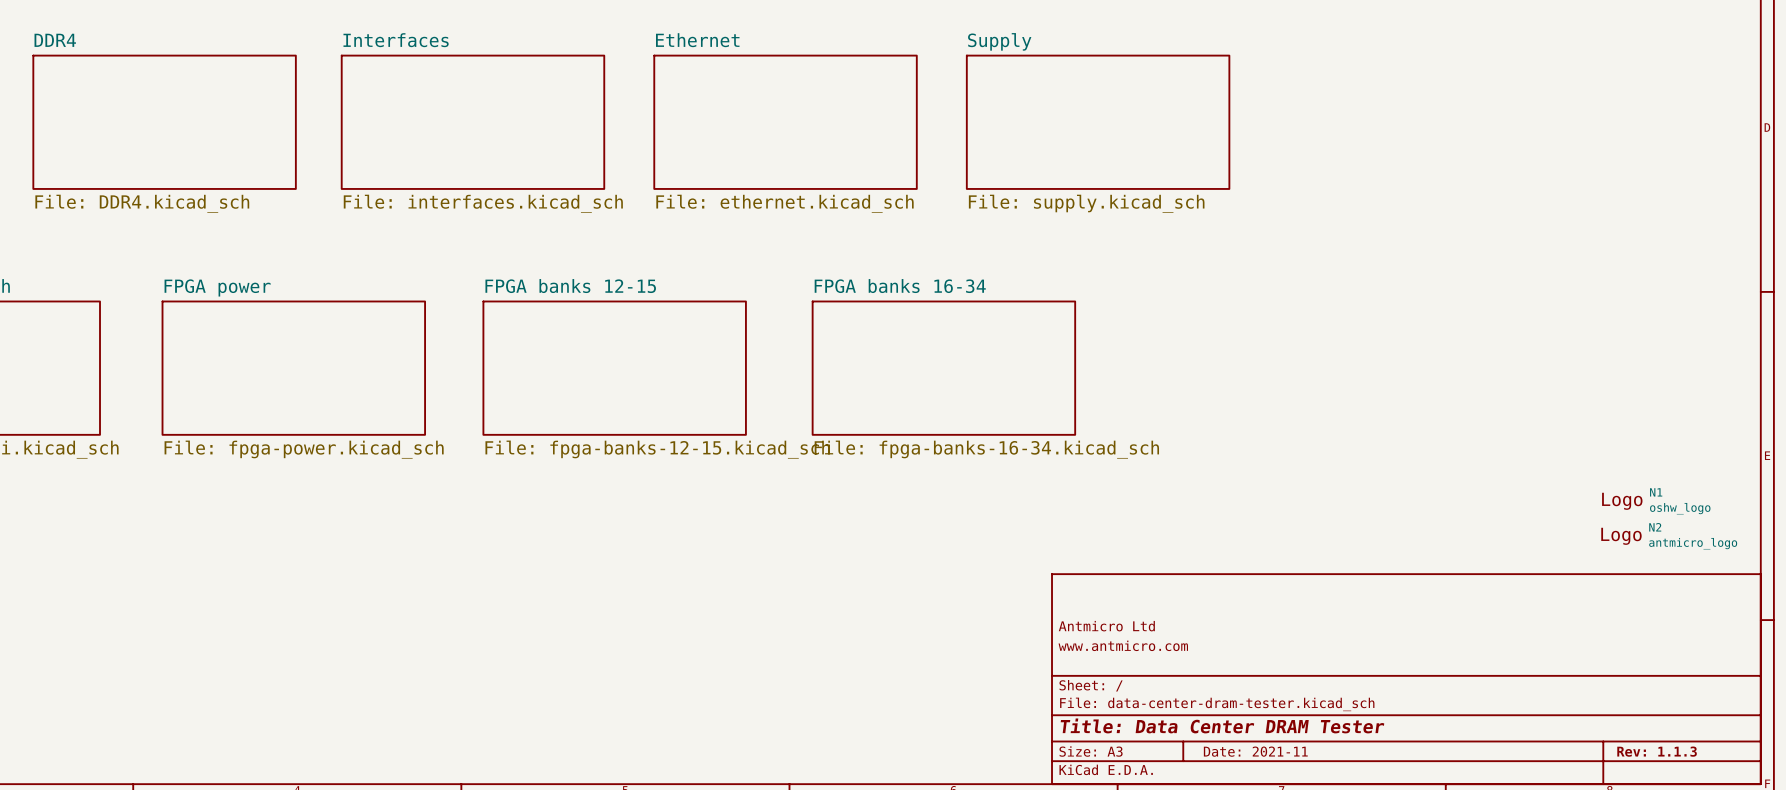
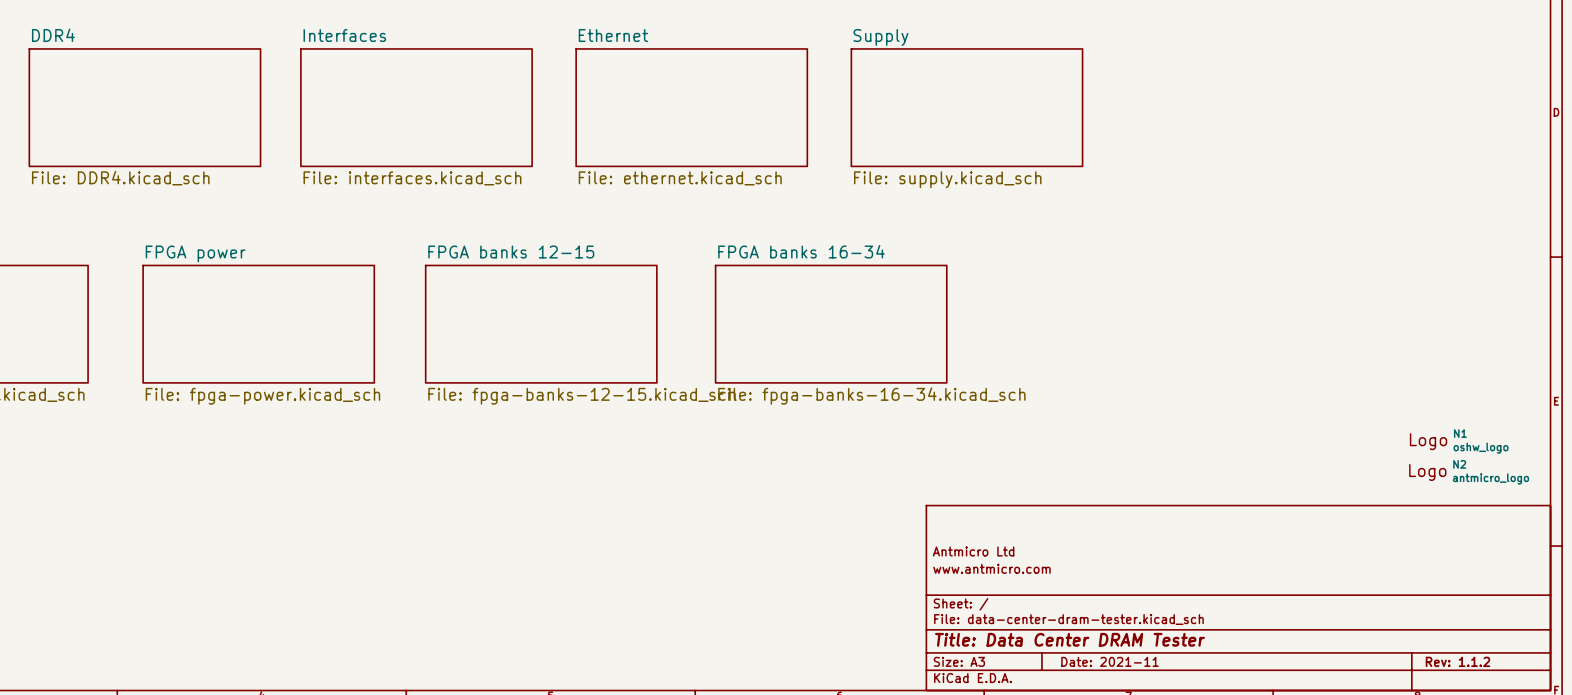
title block: Rev: 1.1.3 (1657, 751) -> Rev: 1.1.2 (1457, 661)

